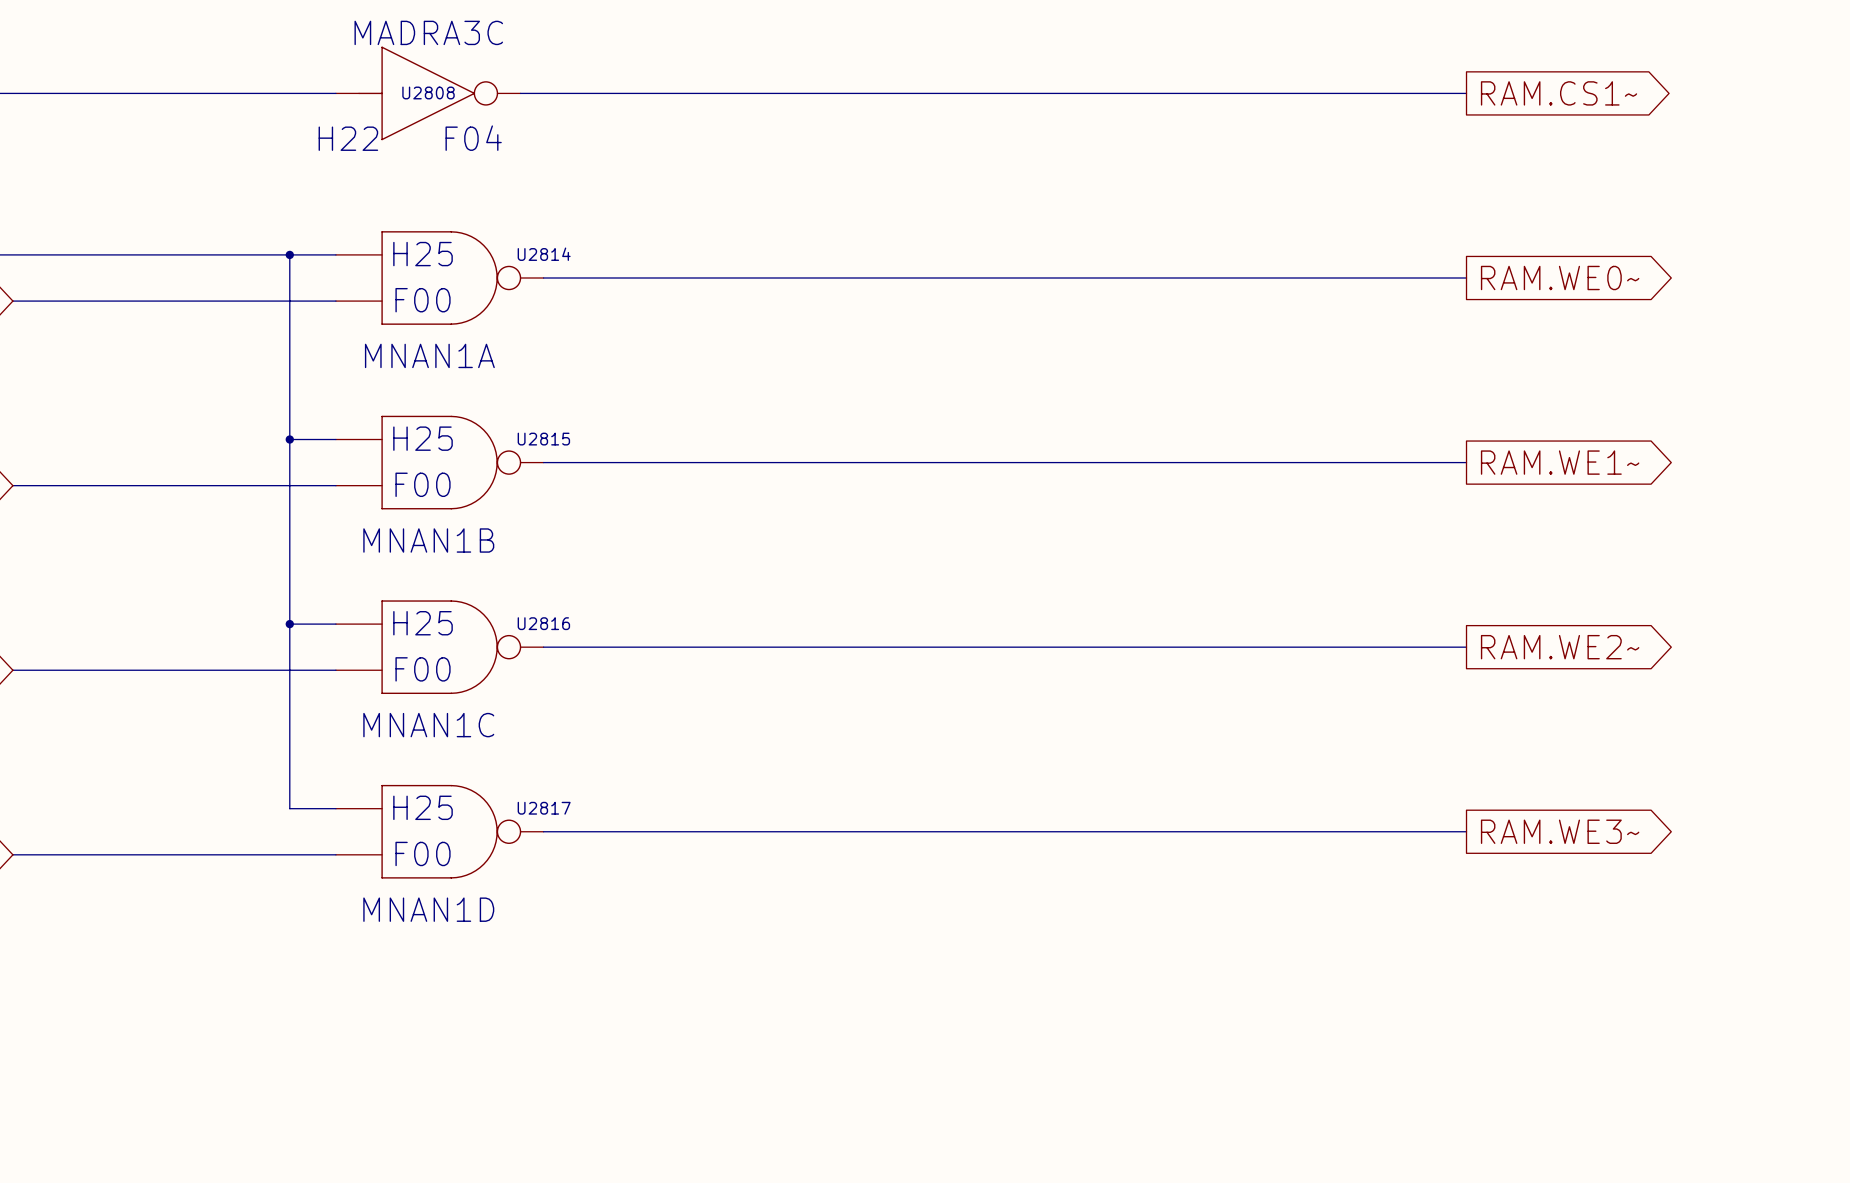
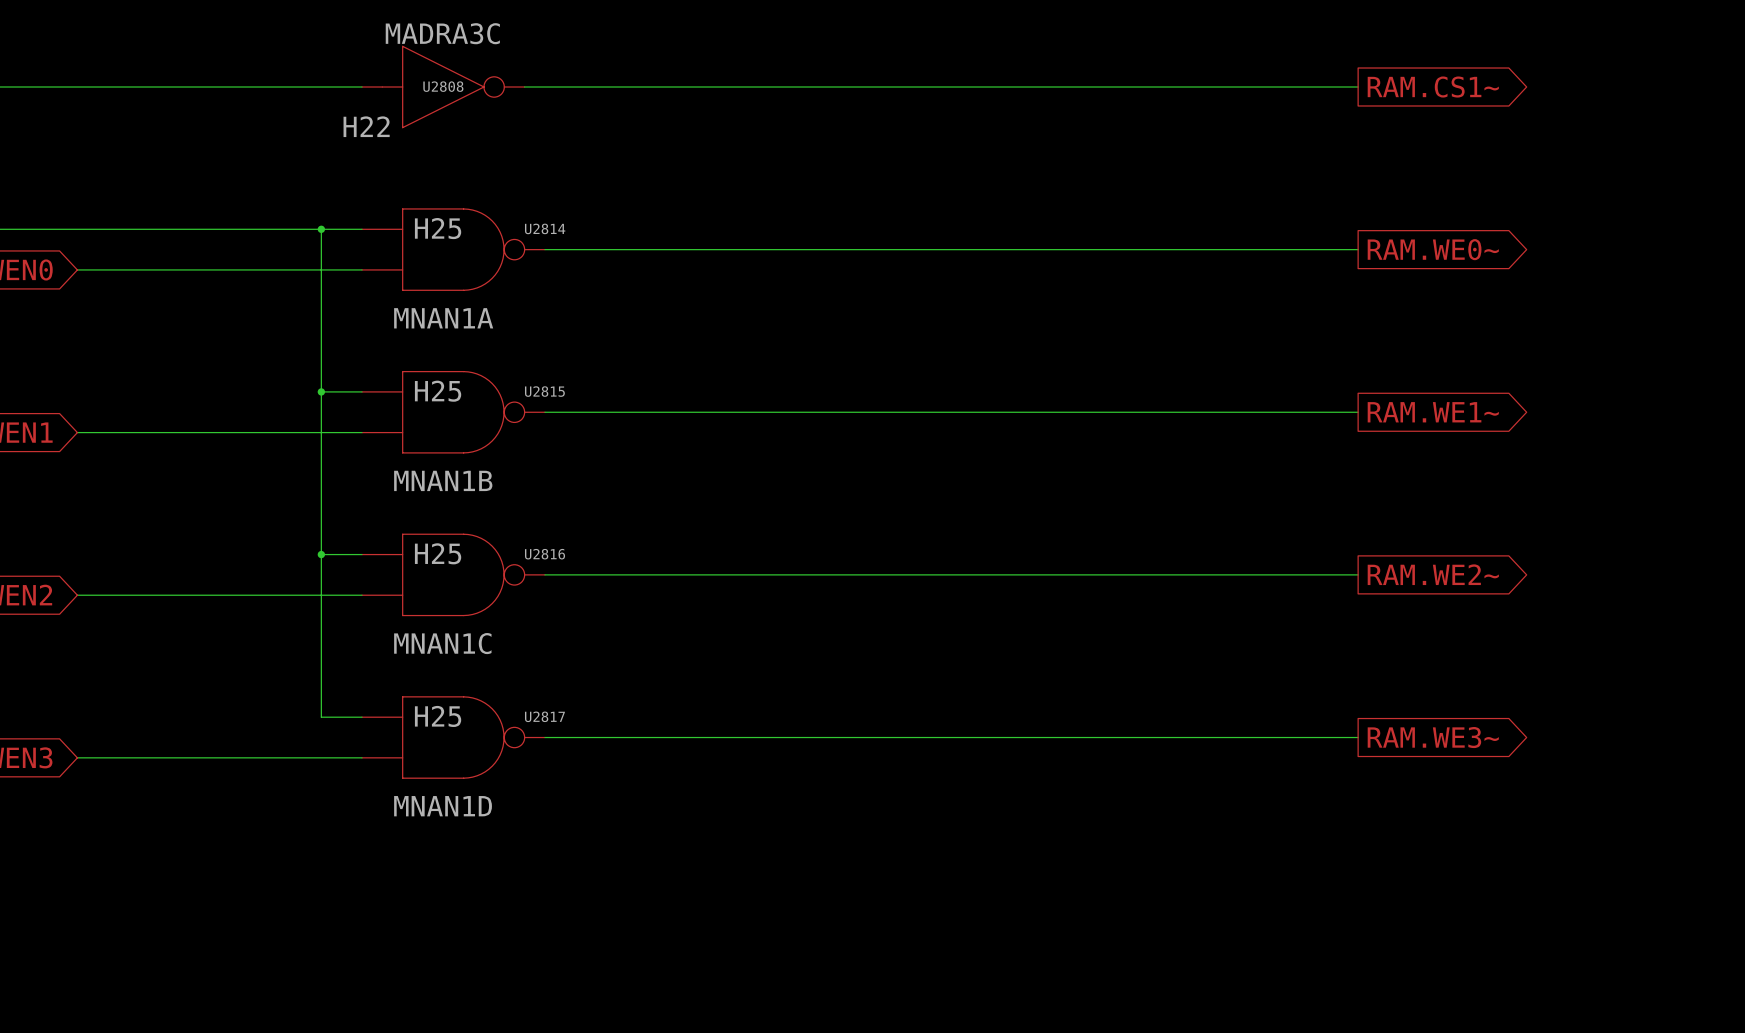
U2808 value: F04 (473, 138) -> none
U2814 value: F00 (423, 300) -> none
U2815 value: F00 (423, 484) -> none
U2816 value: F00 (423, 669) -> none
U2817 value: F00 (423, 853) -> none

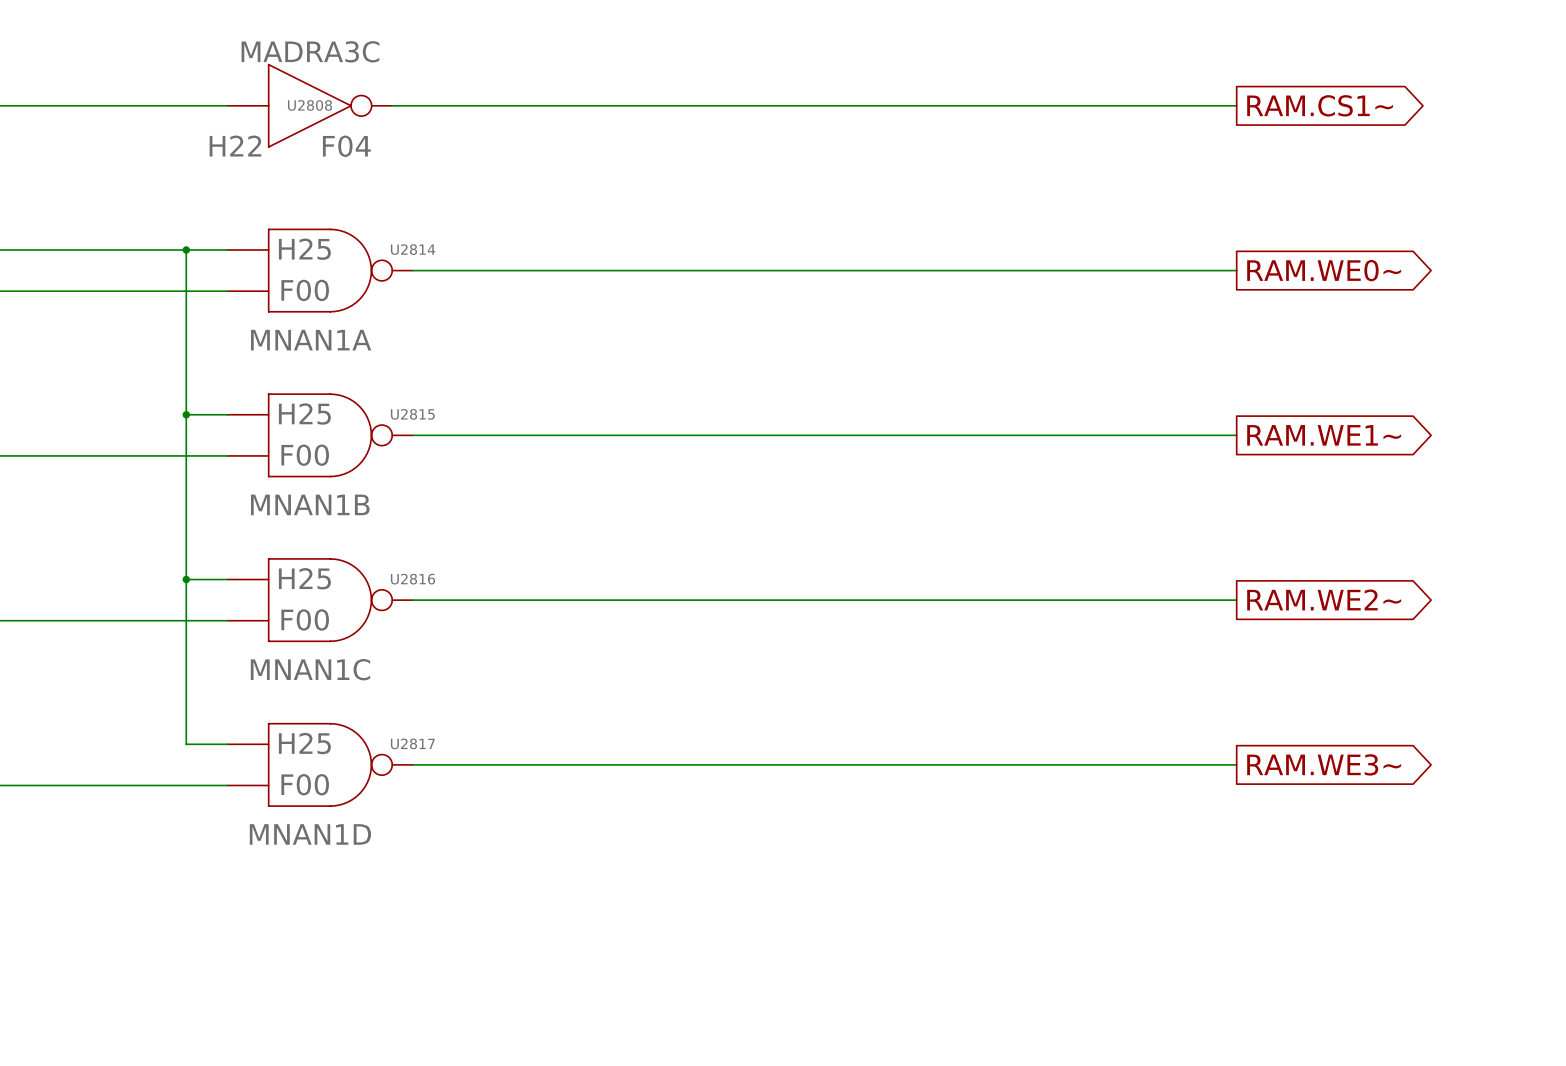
U2808 value: none -> F04 (346, 146)
U2814 value: none -> F00 (305, 290)
U2815 value: none -> F00 (305, 455)
U2816 value: none -> F00 (305, 619)
U2817 value: none -> F00 (305, 784)

